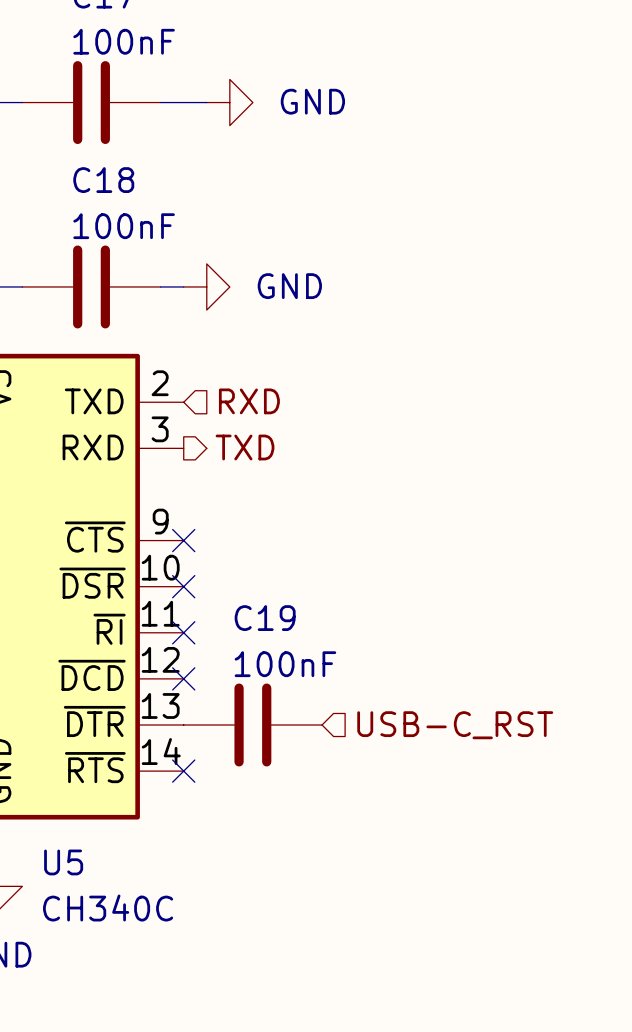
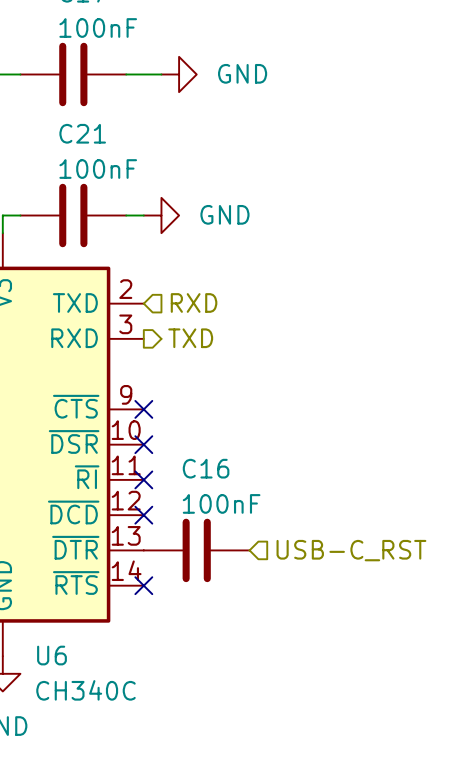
C18 name: C18 (103, 180) -> C21 (82, 133)
C19 name: C19 (265, 618) -> C16 (206, 468)
U5 name: U5 (63, 862) -> U6 (52, 655)

